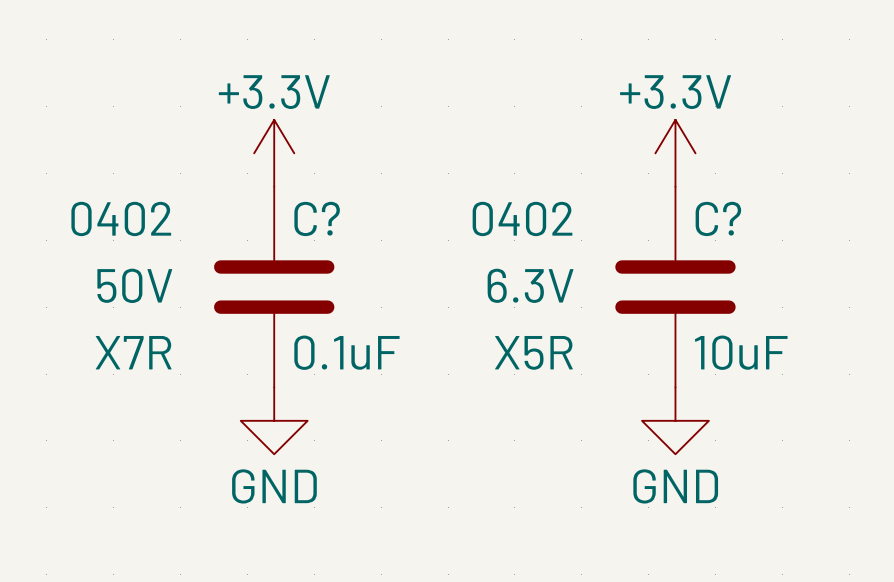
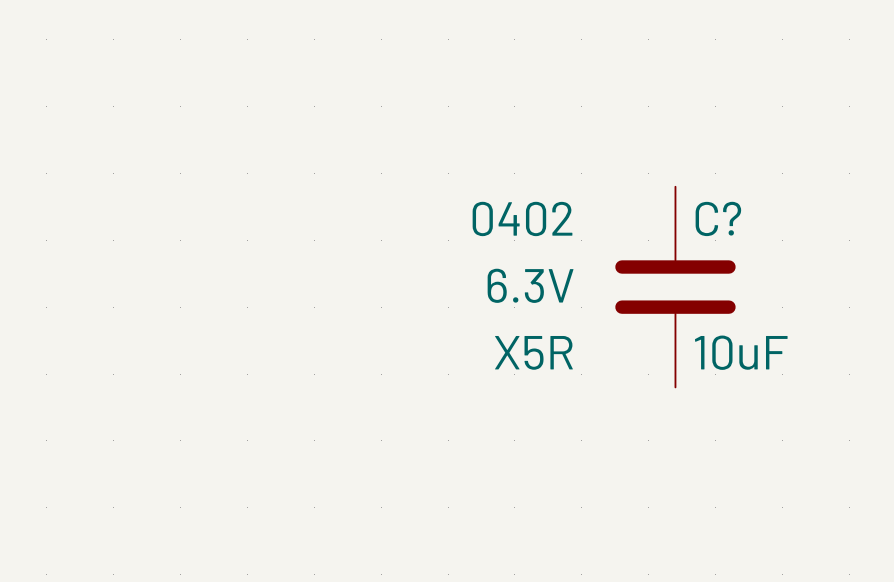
power symbol: +3.3V (274, 153) -> none
power symbol: +3.3V (675, 153) -> none
C?: 0.1uF (274, 287) -> none
power symbol: GND (274, 420) -> none
power symbol: GND (675, 420) -> none

